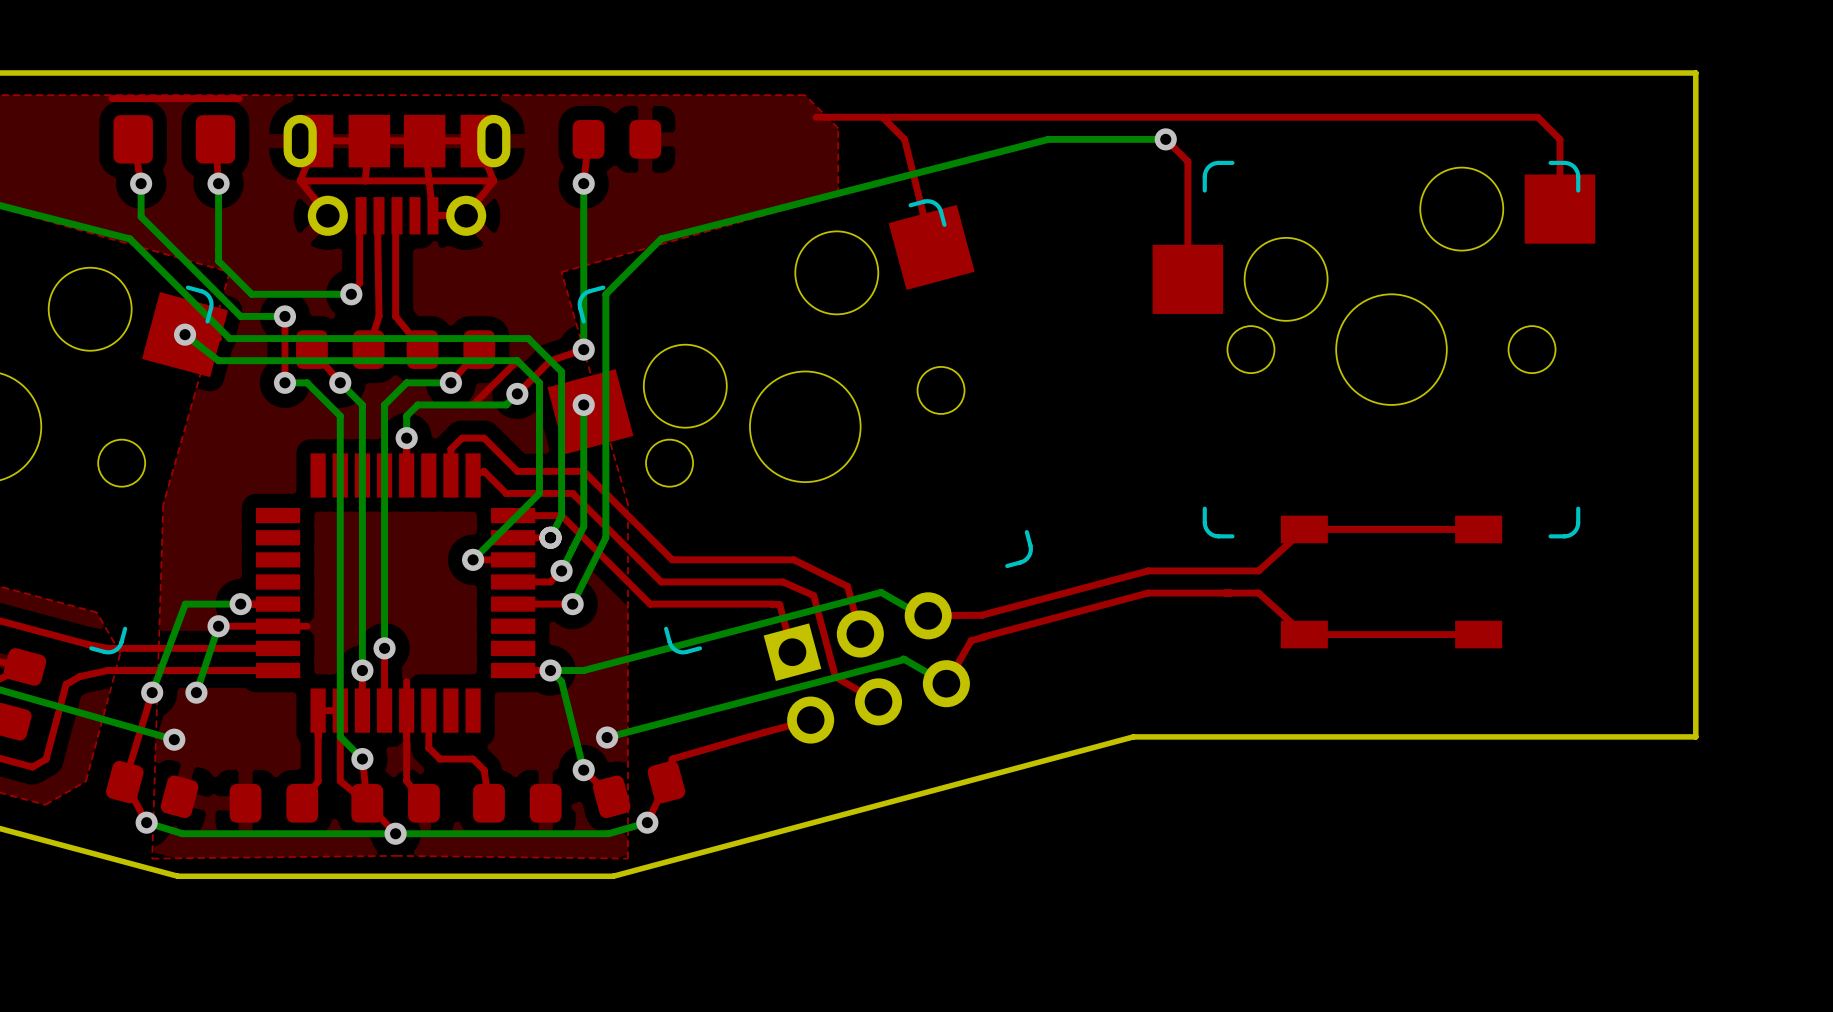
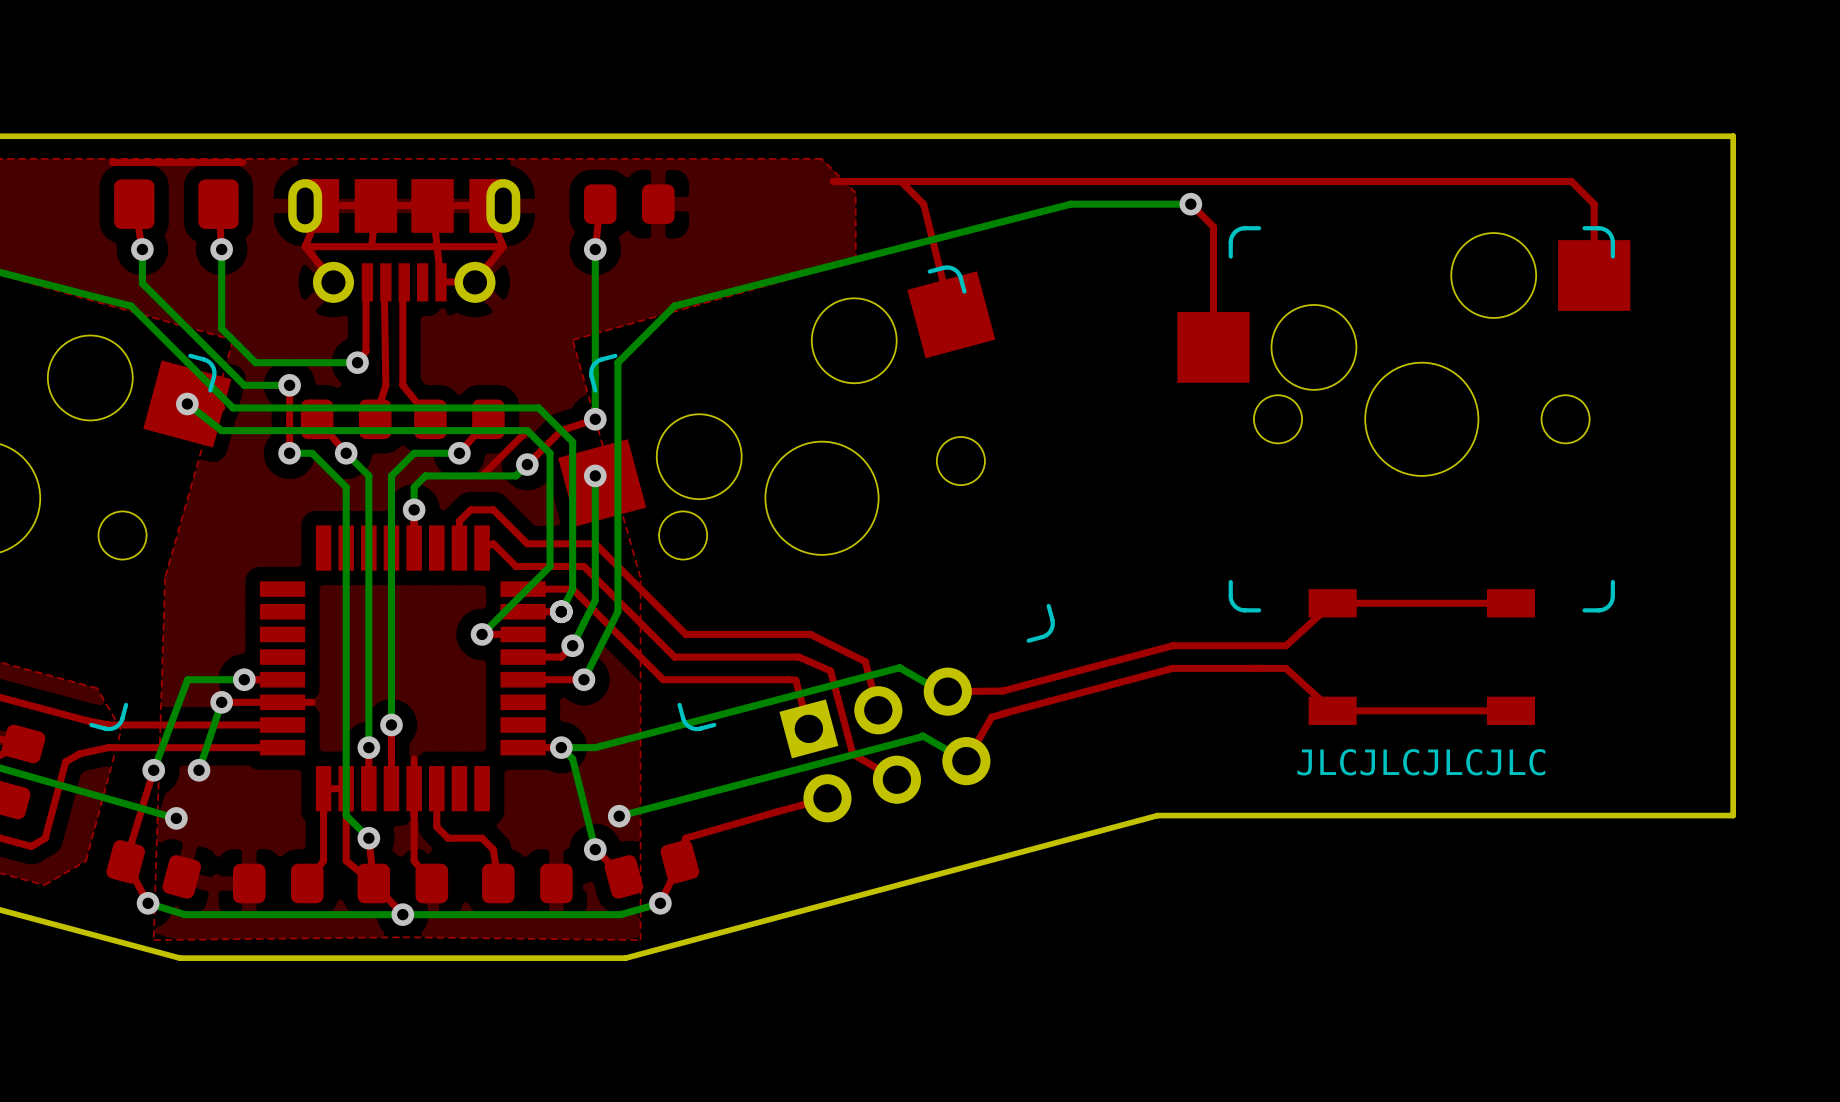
text: none -> JLCJLCJLCJLC (1421, 762)

